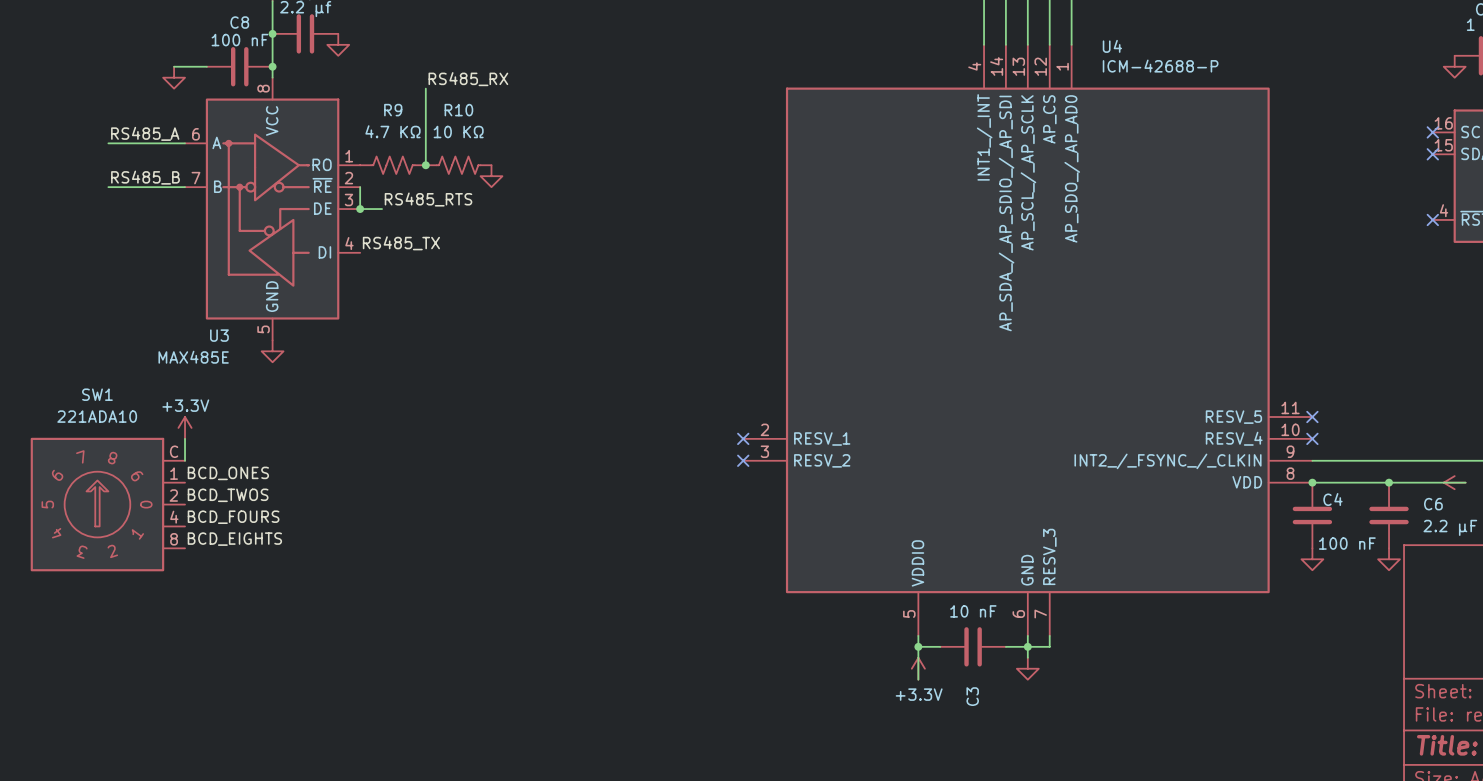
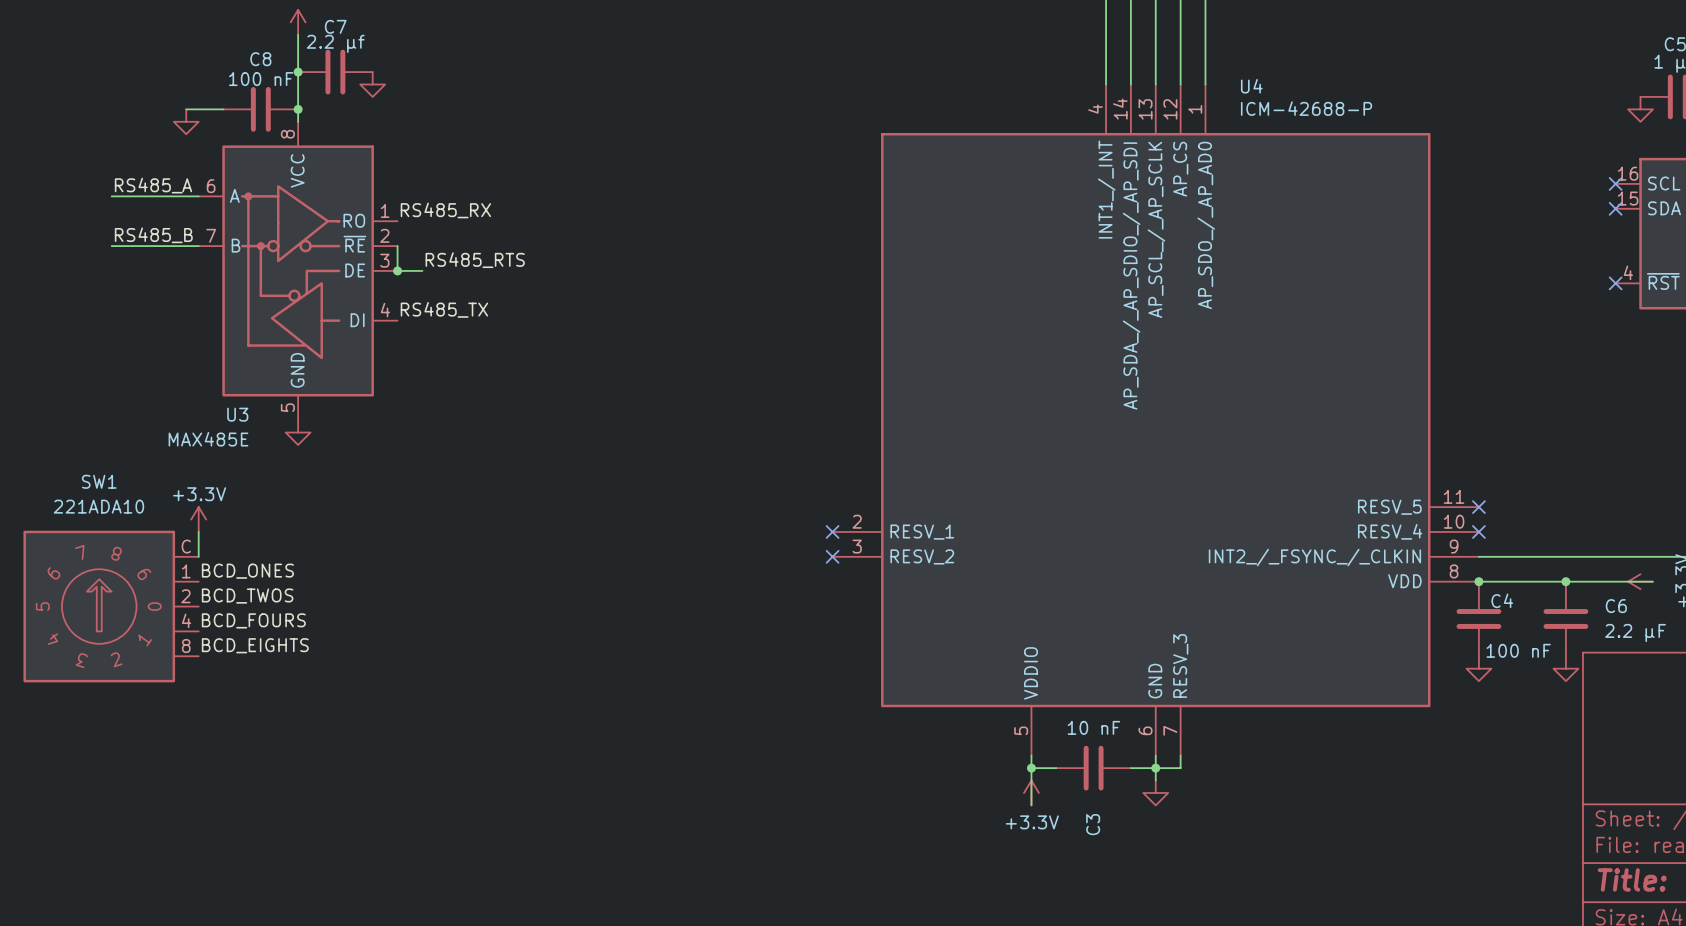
label position: RS485_RX (468, 79) -> RS485_RX (445, 210)
wire: (425, 88) (425, 165) -> none
R9: 4.7 KΩ (392, 165) -> none
junction: (425, 165) -> none
R10: 10 KΩ (458, 165) -> none
power symbol: (491, 176) -> none

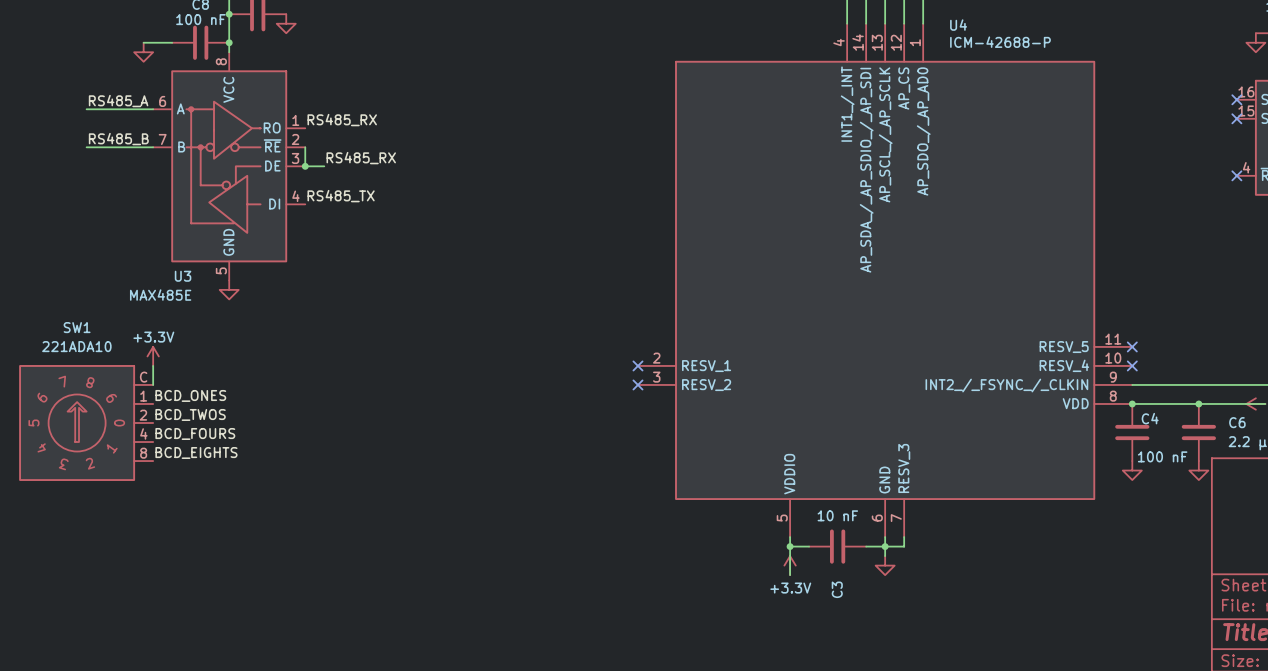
label: RS485_RTS (475, 260) -> RS485_RX (361, 158)

